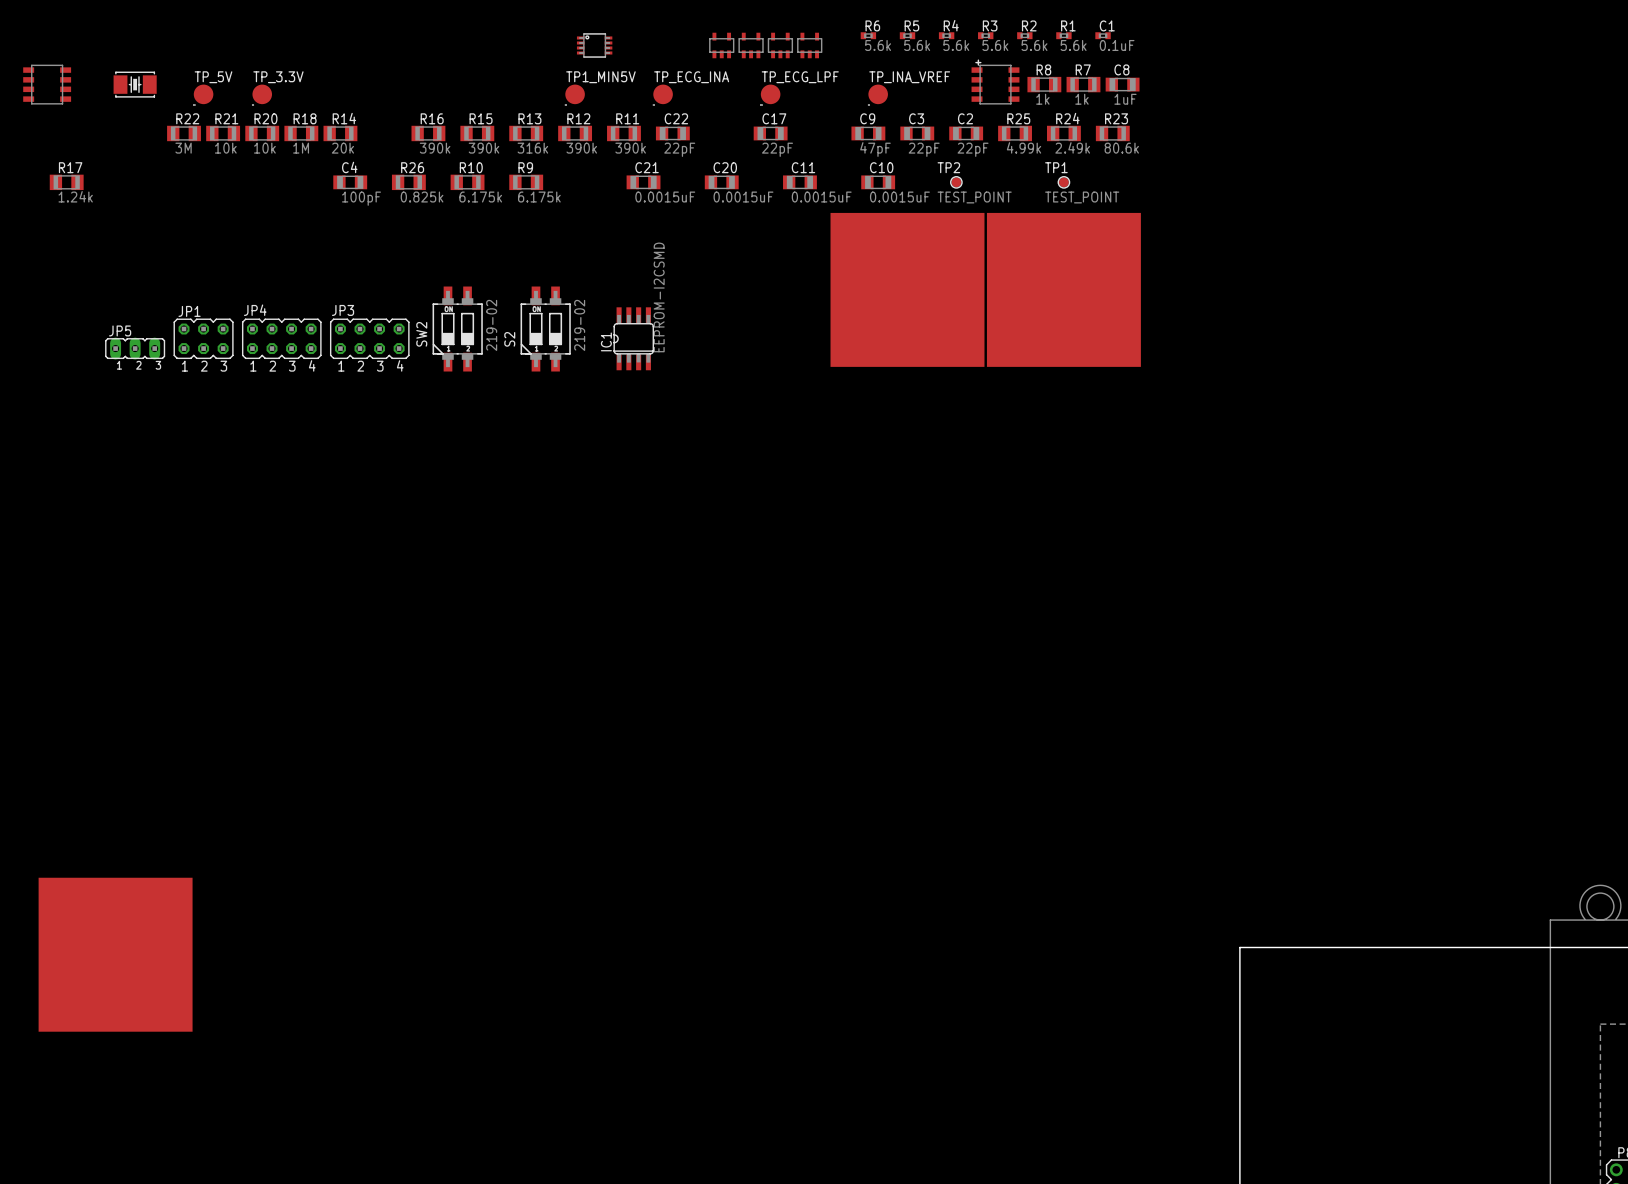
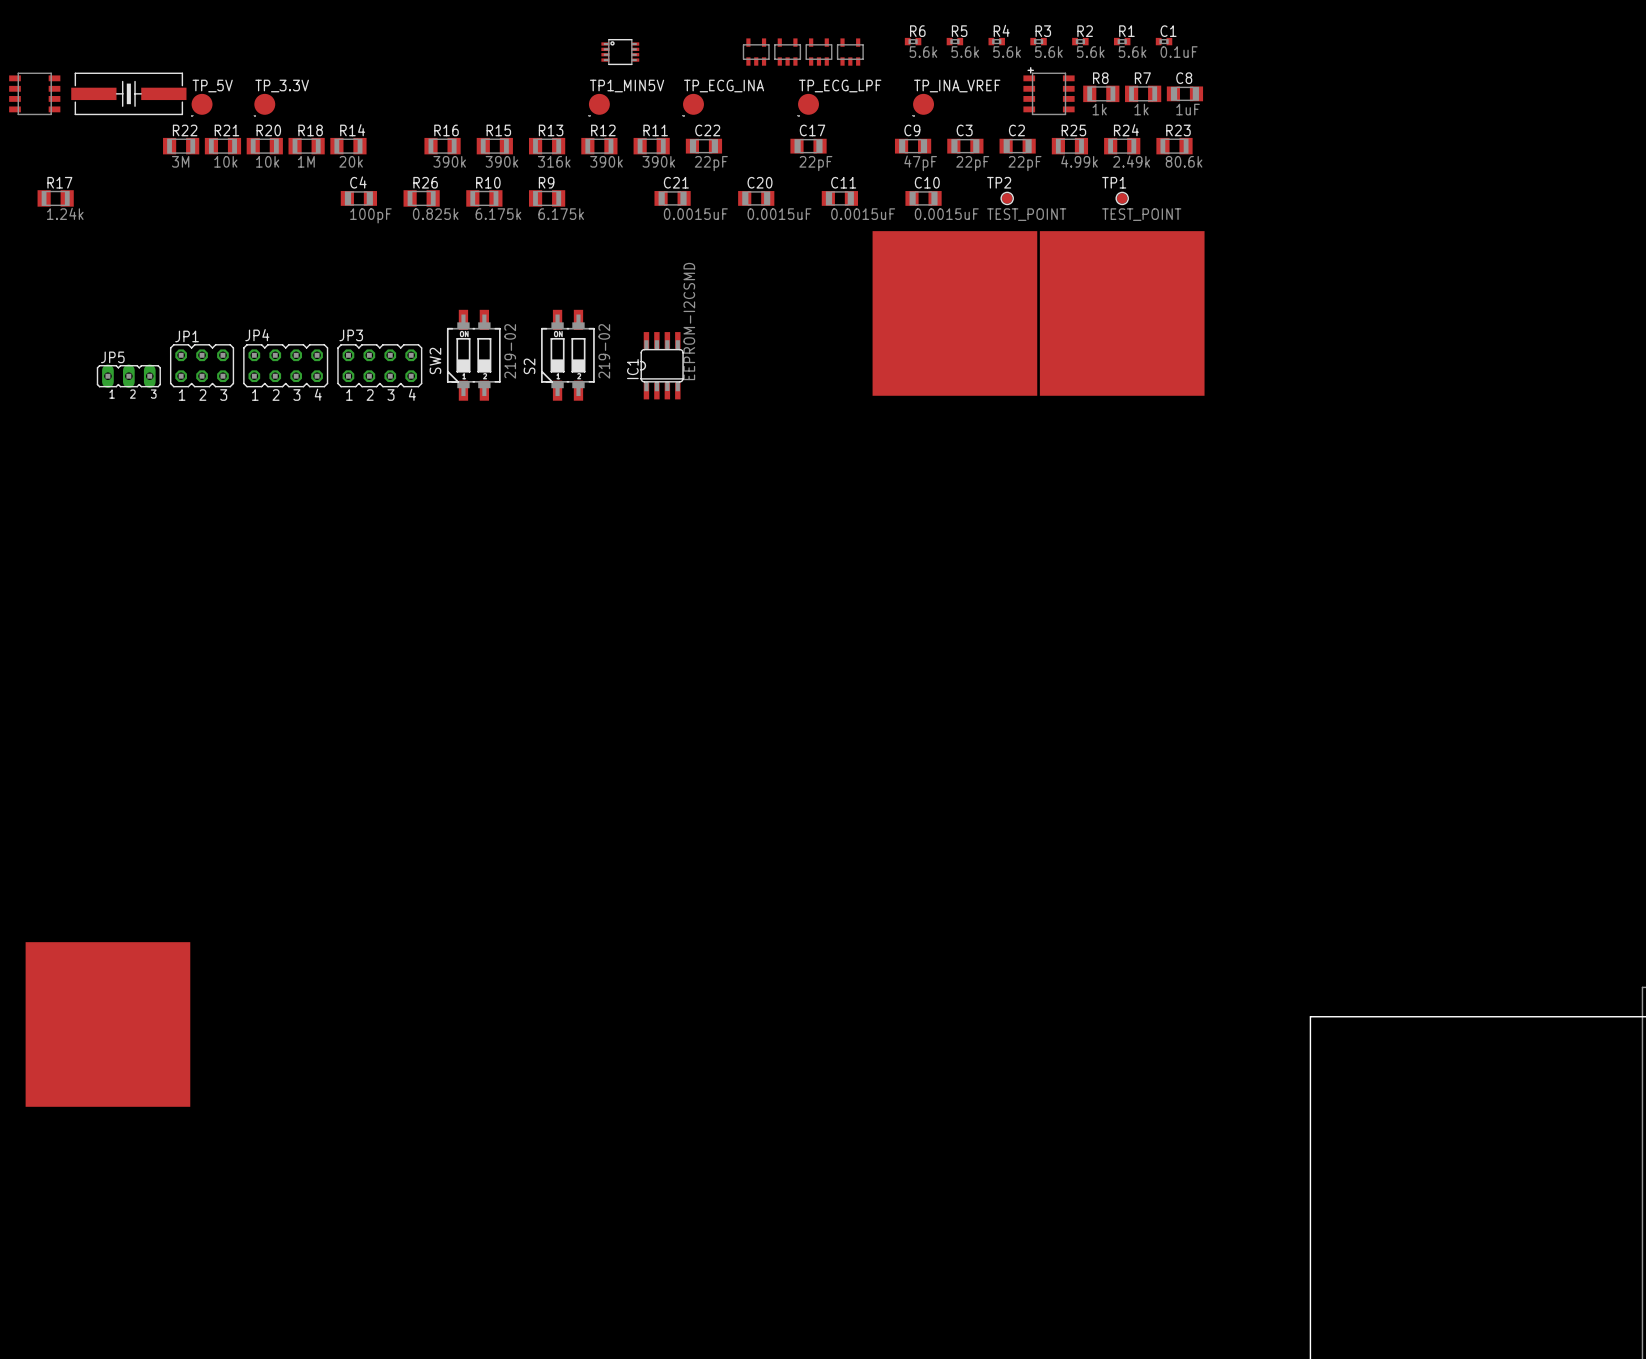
part footprint: [113, 71, 157, 98] -> [71, 72, 187, 115]

